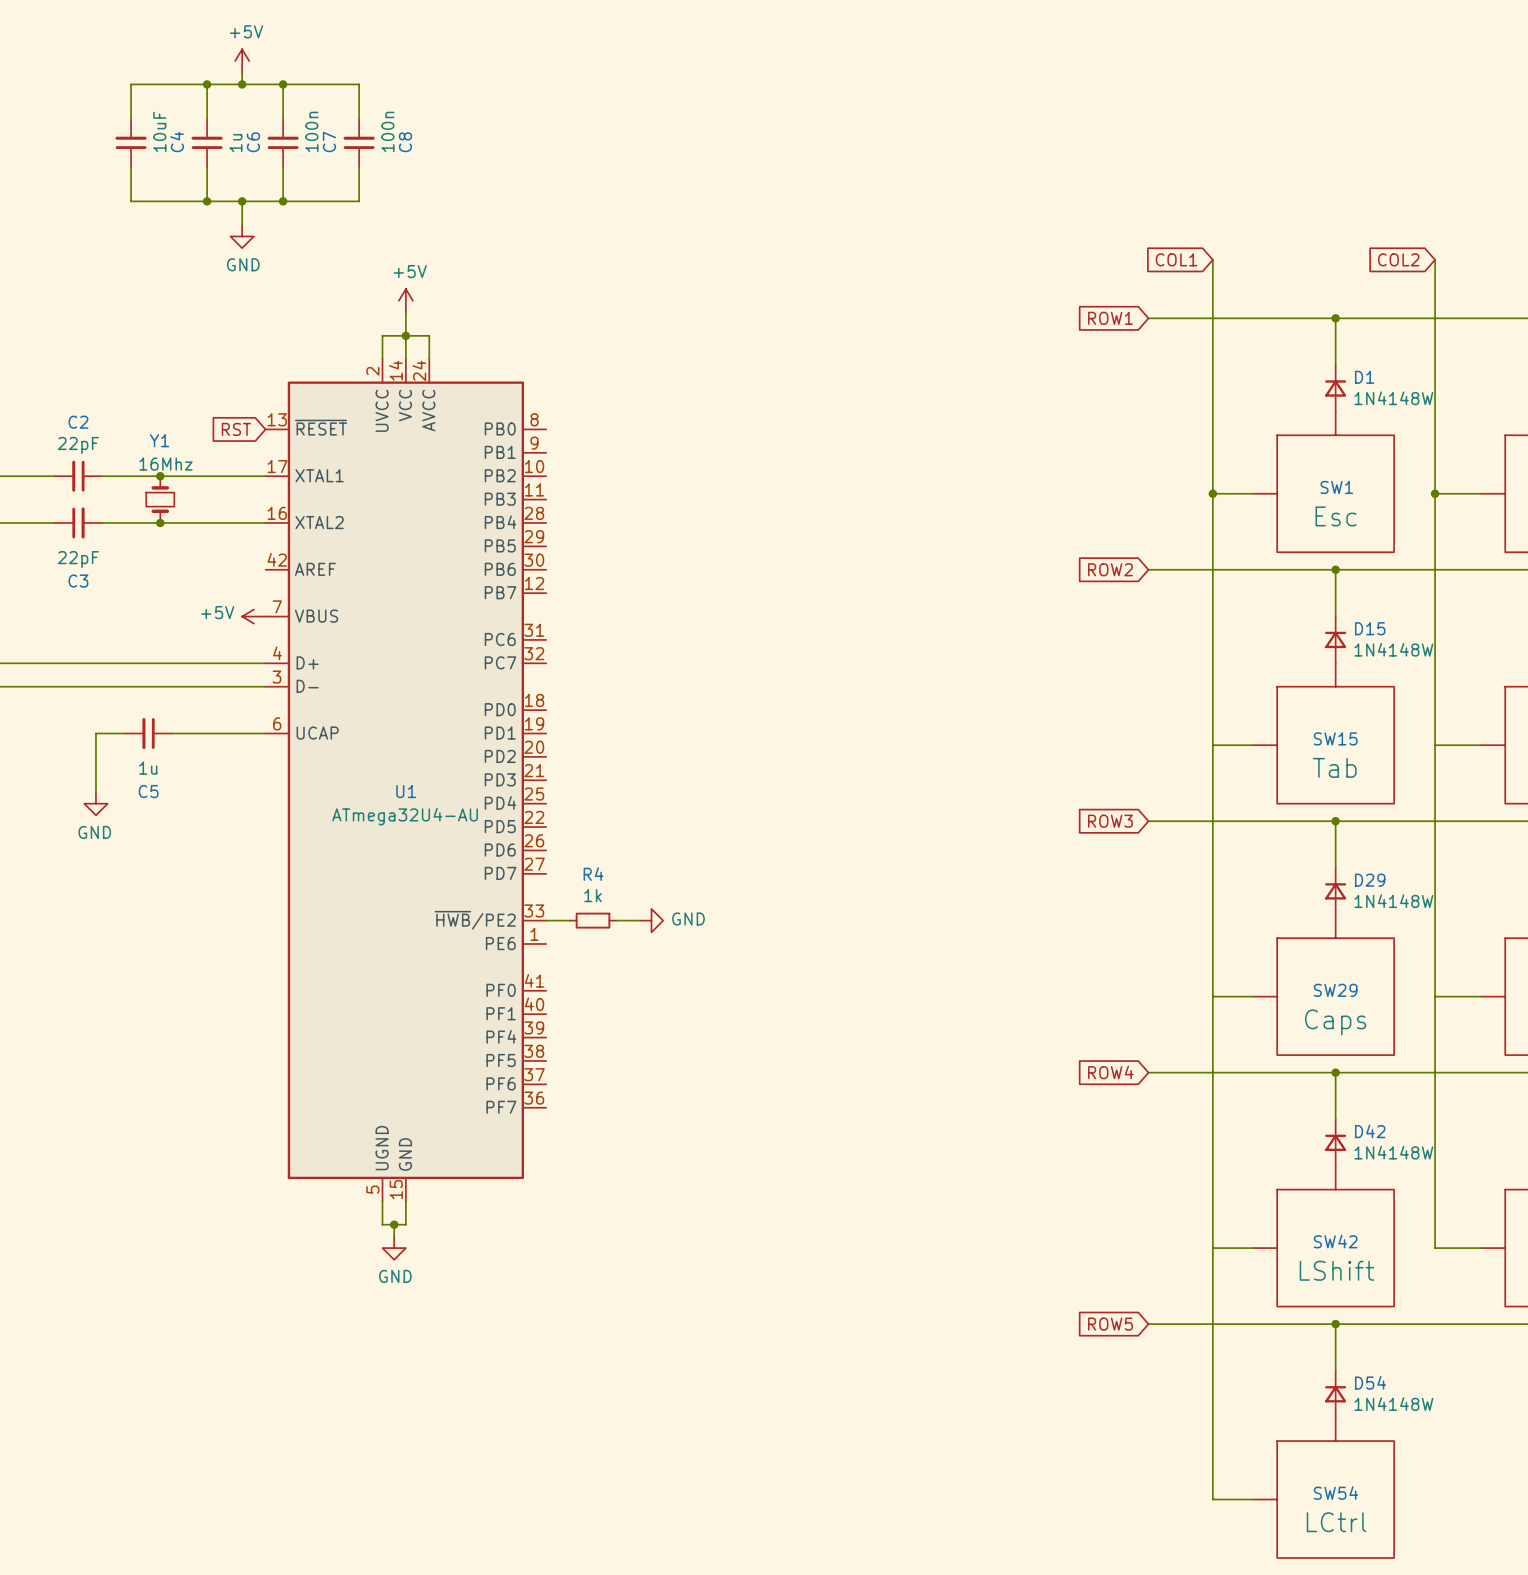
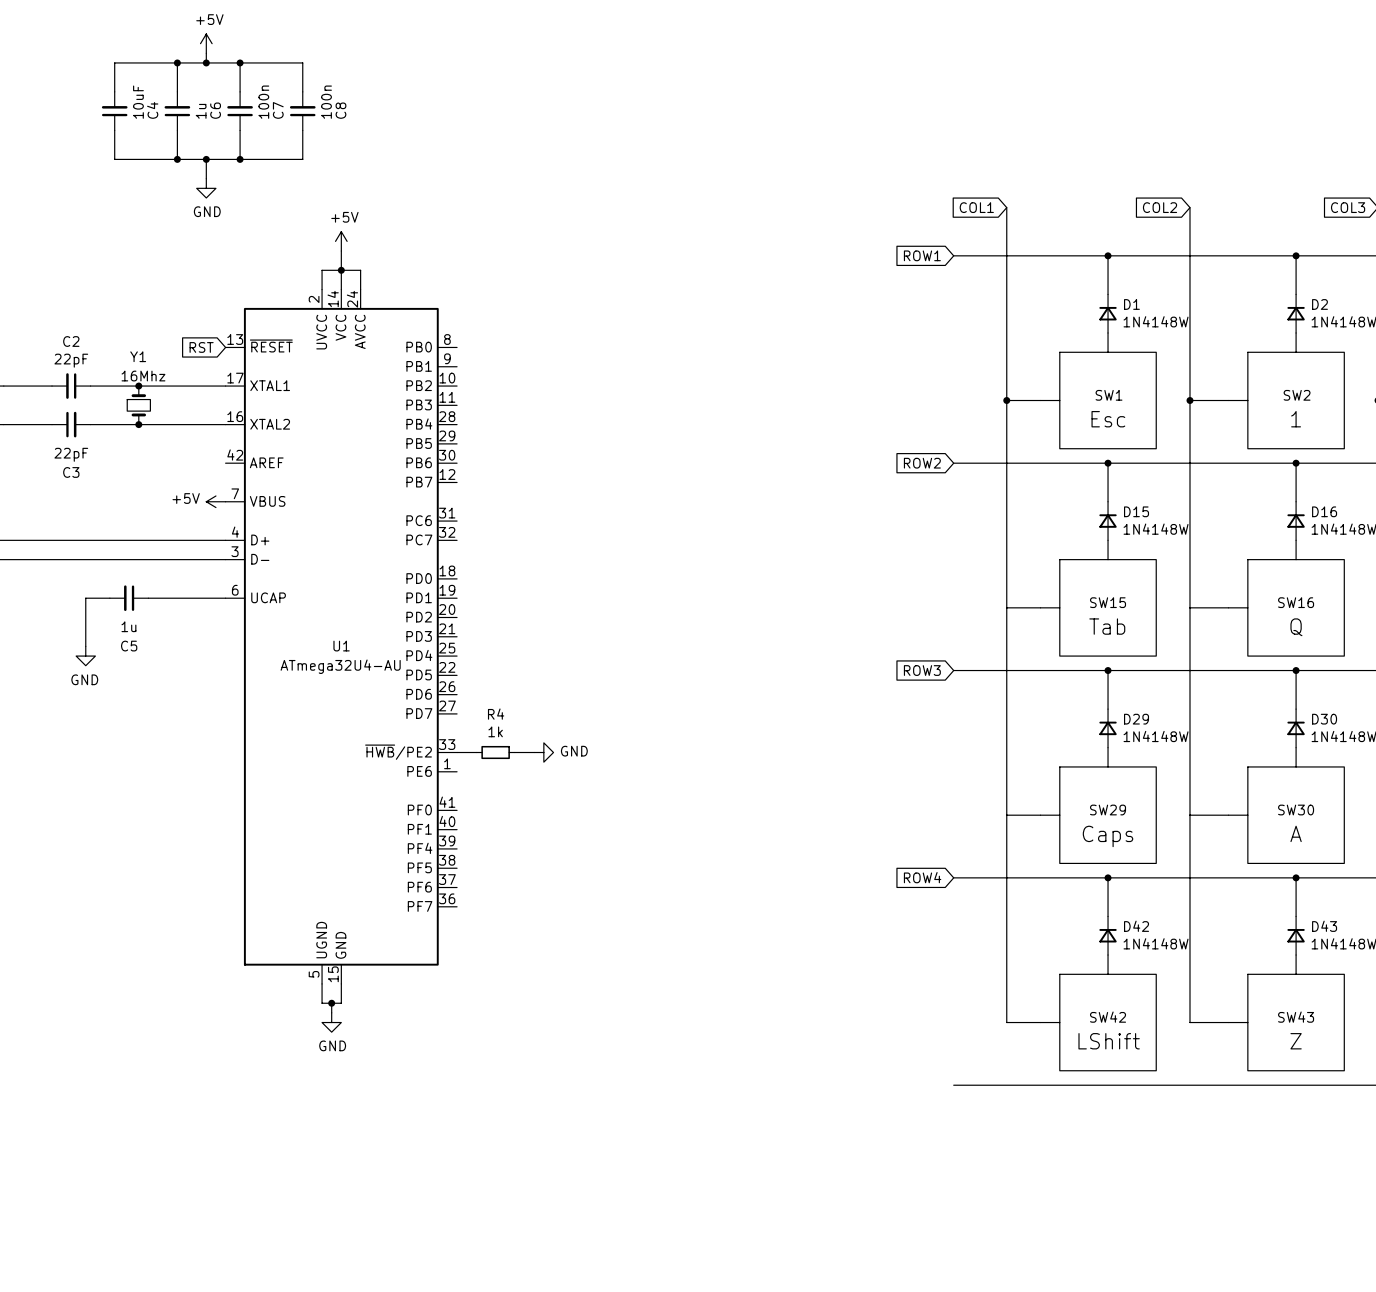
wire: (1212, 1248) (1212, 1499) (1253, 1499) -> none
global label: ROW5 (1110, 1324) -> none
wire: (1335, 1324) (1335, 1370) -> none
junction: (1335, 1324) -> none
D54: 1N4148W (1335, 1394) -> none
SW54: LCtrl (1323, 1487) -> none

